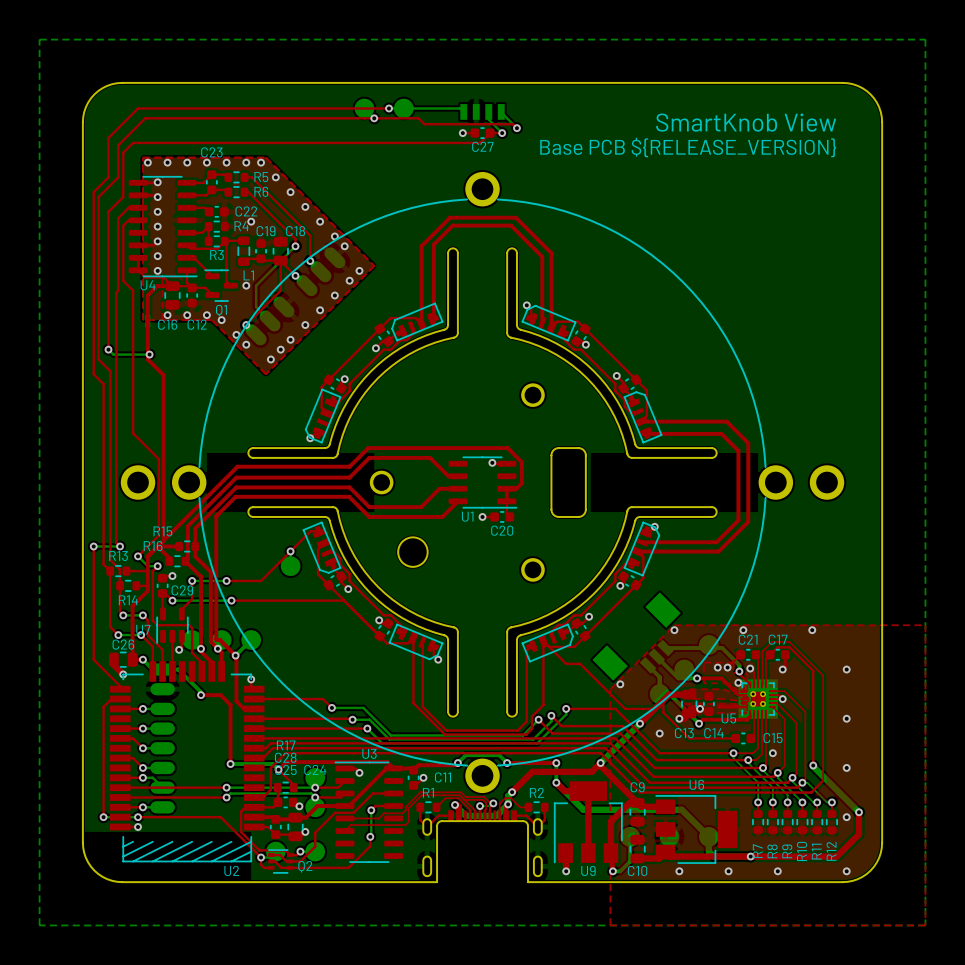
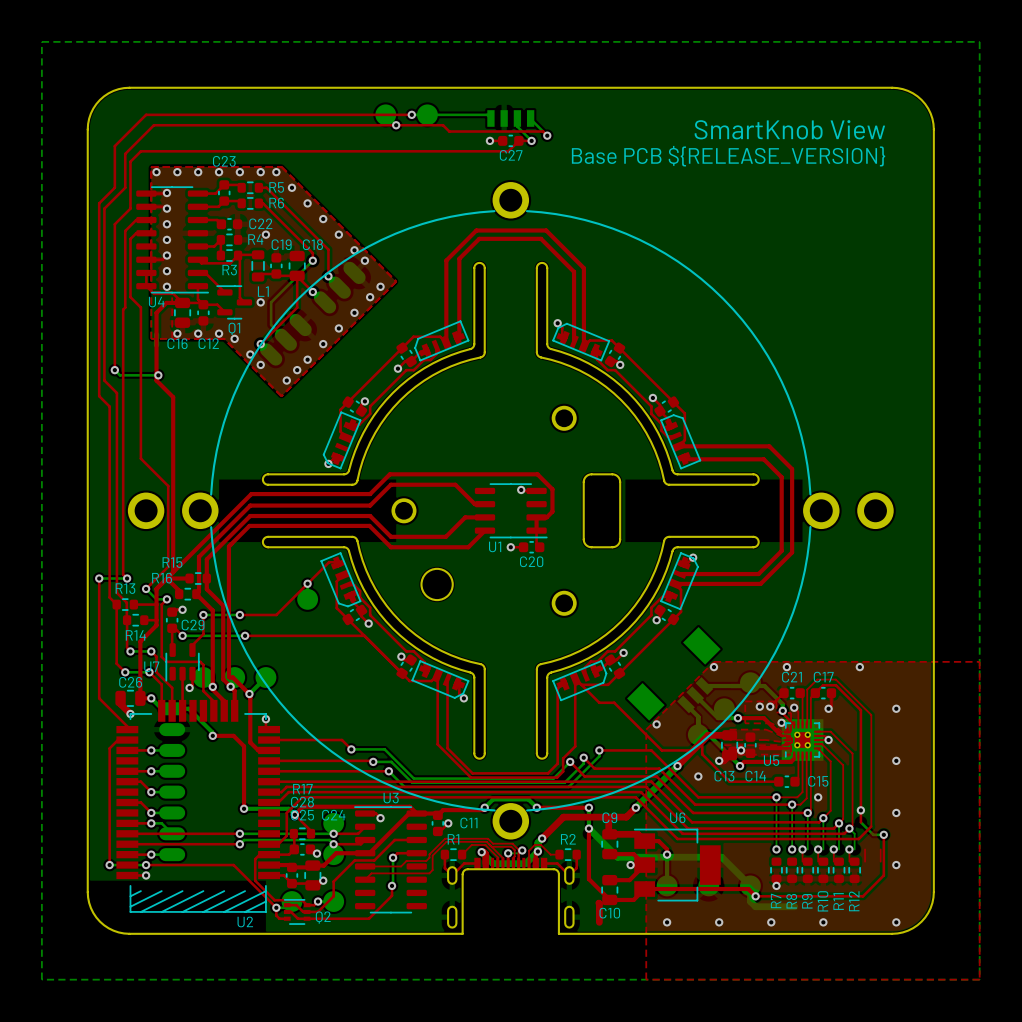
bottom track: (733, 758) (758, 782) (758, 802) -> (776, 802) (776, 849)
top track: (600, 763) (600, 765) (641, 806) (665, 806) -> none
bottom track: (748, 763) (772, 787) (772, 802) -> (792, 807) (792, 849)
top track: none -> (860, 810) (860, 822)
bottom track: (813, 765) (859, 812) -> none
bottom track: (763, 770) (787, 795) (787, 802) -> (807, 815) (807, 849)
top track: none -> (608, 817) (609, 834) (637, 834) (644, 841) (658, 841) (667, 849) (667, 854)
bottom track: none -> (860, 822) (873, 834) (883, 834)
bottom track: (777, 777) (802, 802) -> (823, 823) (823, 849)
bottom track: (792, 781) (813, 802) (817, 802) -> (839, 827) (839, 849)
top track: (556, 782) (564, 791) (588, 791) (588, 853) -> none
bottom track: (802, 782) (807, 782) (827, 802) (831, 802) -> (849, 828) (854, 833) (854, 849)
top track: none -> (588, 833) (588, 879) (609, 899) (633, 899) (644, 889) (748, 889) (755, 896) (862, 896) (883, 875) (883, 834)
via: none -> (883, 834)
top track: (637, 802) (629, 802) (610, 821) (612, 871) -> none
via: none -> (776, 849)
via: none -> (792, 849)
via: (817, 802) -> none
via: (831, 802) -> none
top track: none -> (609, 854) (633, 854) (644, 865)
via: none -> (667, 854)
C9 position: (637, 812) -> (609, 844)
top track: (859, 812) (859, 834) (836, 856) (670, 856) (665, 852) (659, 858) (637, 858) -> none
via: (859, 812) -> none
via: none -> (630, 865)
top track: none -> (644, 865) (629, 880) (609, 880)
U9: (588, 822) -> none
R7 position: (758, 822) -> (776, 870)
R8 position: (772, 822) -> (792, 870)
R9 position: (787, 822) -> (807, 870)
R10 position: (802, 822) -> (823, 870)
R11 position: (817, 822) -> (839, 870)
R12 position: (831, 822) -> (854, 870)
U6 position: (696, 829) -> (677, 865)
bottom track: (630, 836) (630, 861) (620, 871) (612, 871) -> (667, 885) (667, 854)
via: none -> (776, 885)
via: none -> (755, 896)
C10 position: (637, 849) -> (609, 890)
via: (750, 856) -> none
via: (566, 871) -> none
via position: (612, 871) -> (667, 922)

